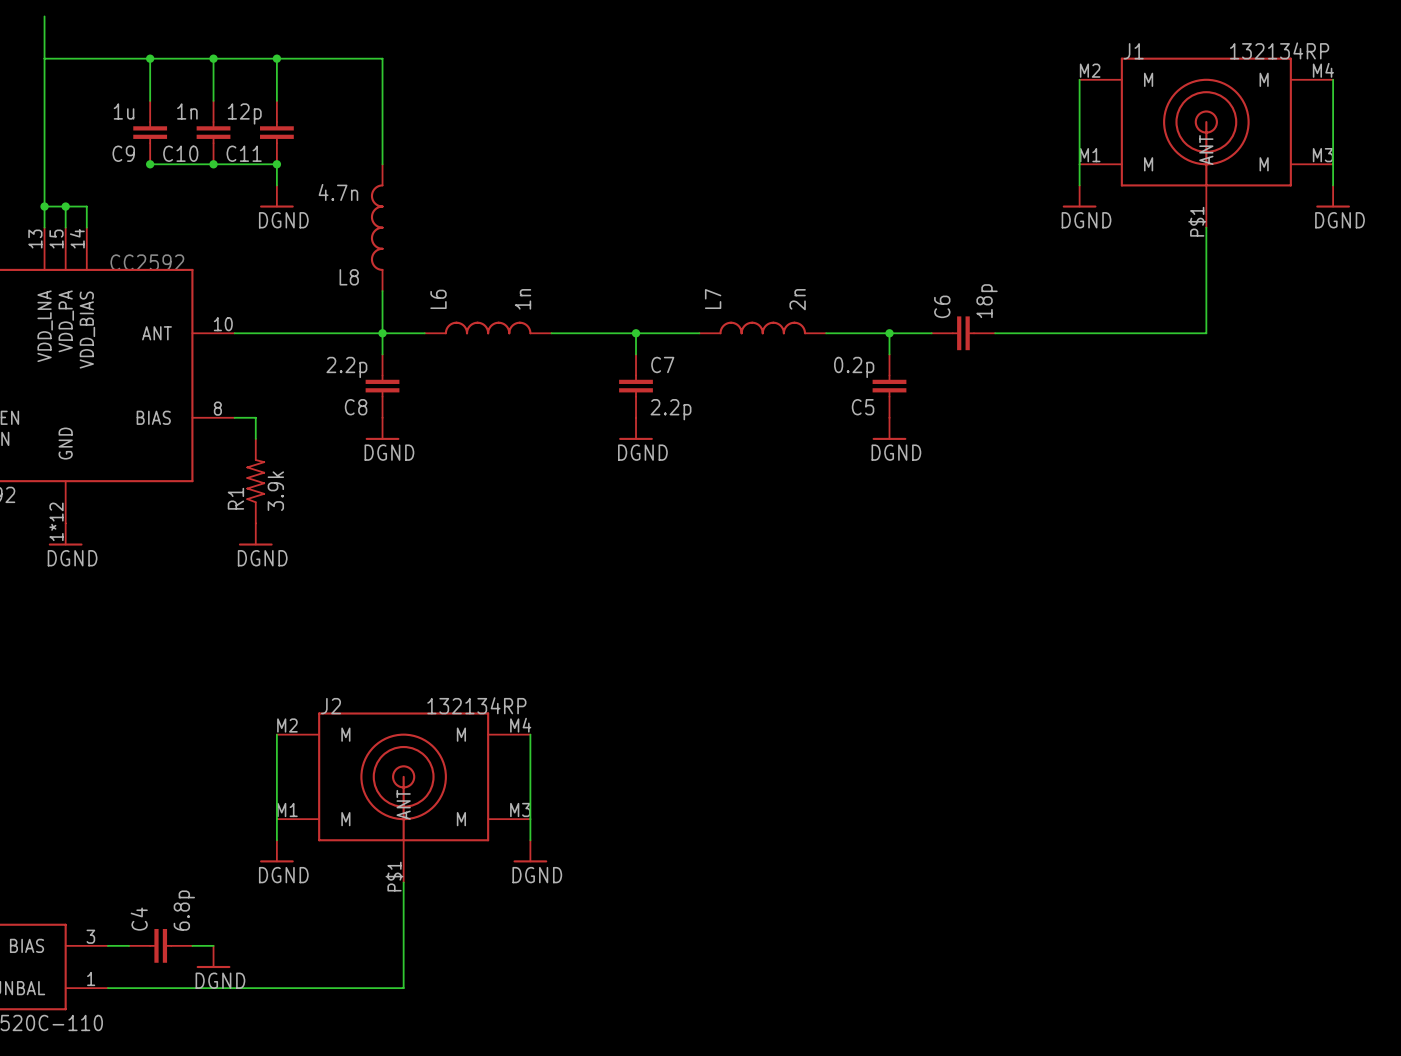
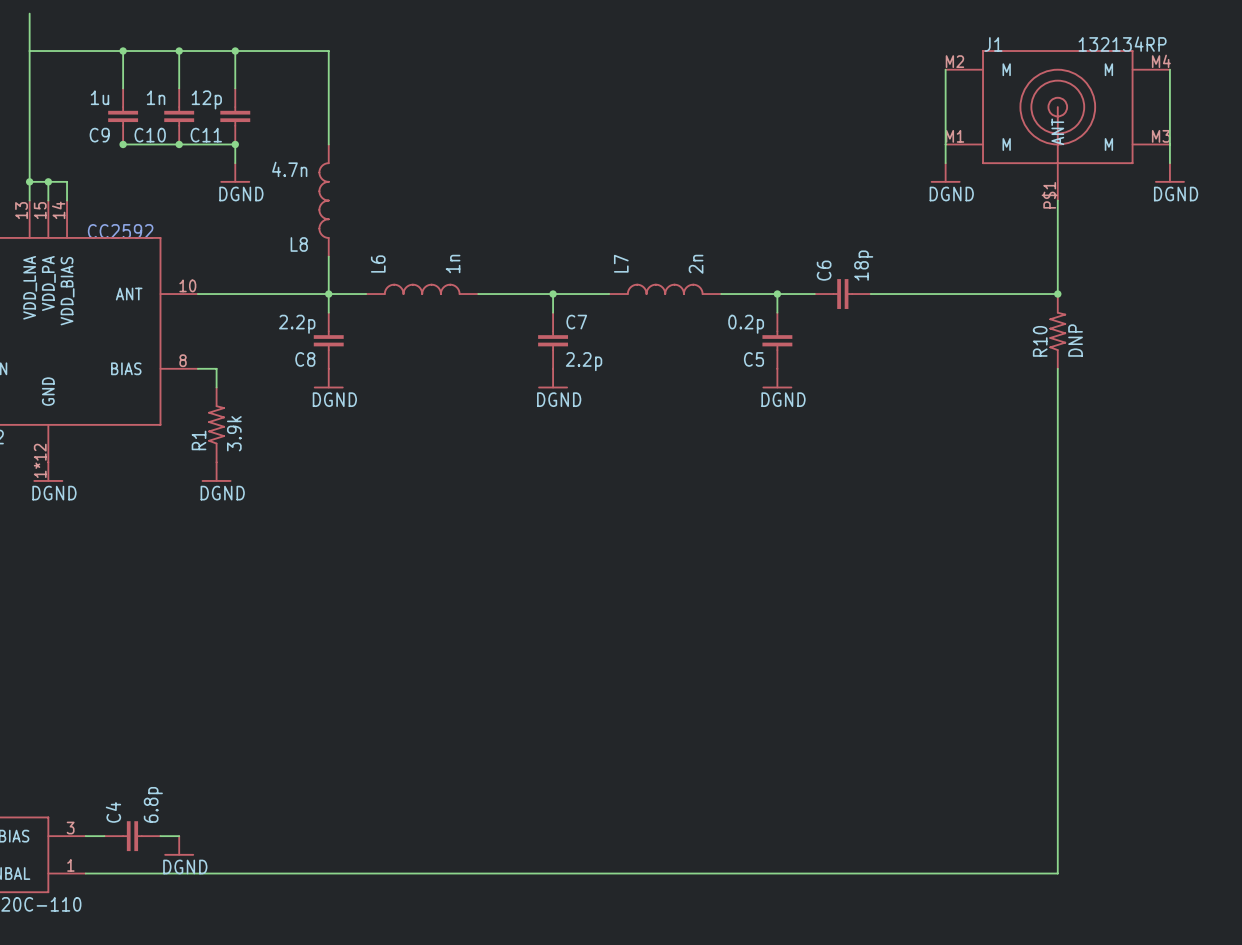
junction: none -> (1057, 294)
R10: none -> DNP (1057, 331)
wire: (276, 734) (276, 840) -> none
wire: (530, 734) (530, 840) -> none
J2: 132134RP (403, 797) -> none
power symbol: DGND (276, 851) -> none
power symbol: DGND (530, 851) -> none
wire: (403, 882) (403, 988) -> (1057, 368) (1057, 873) (347, 873)

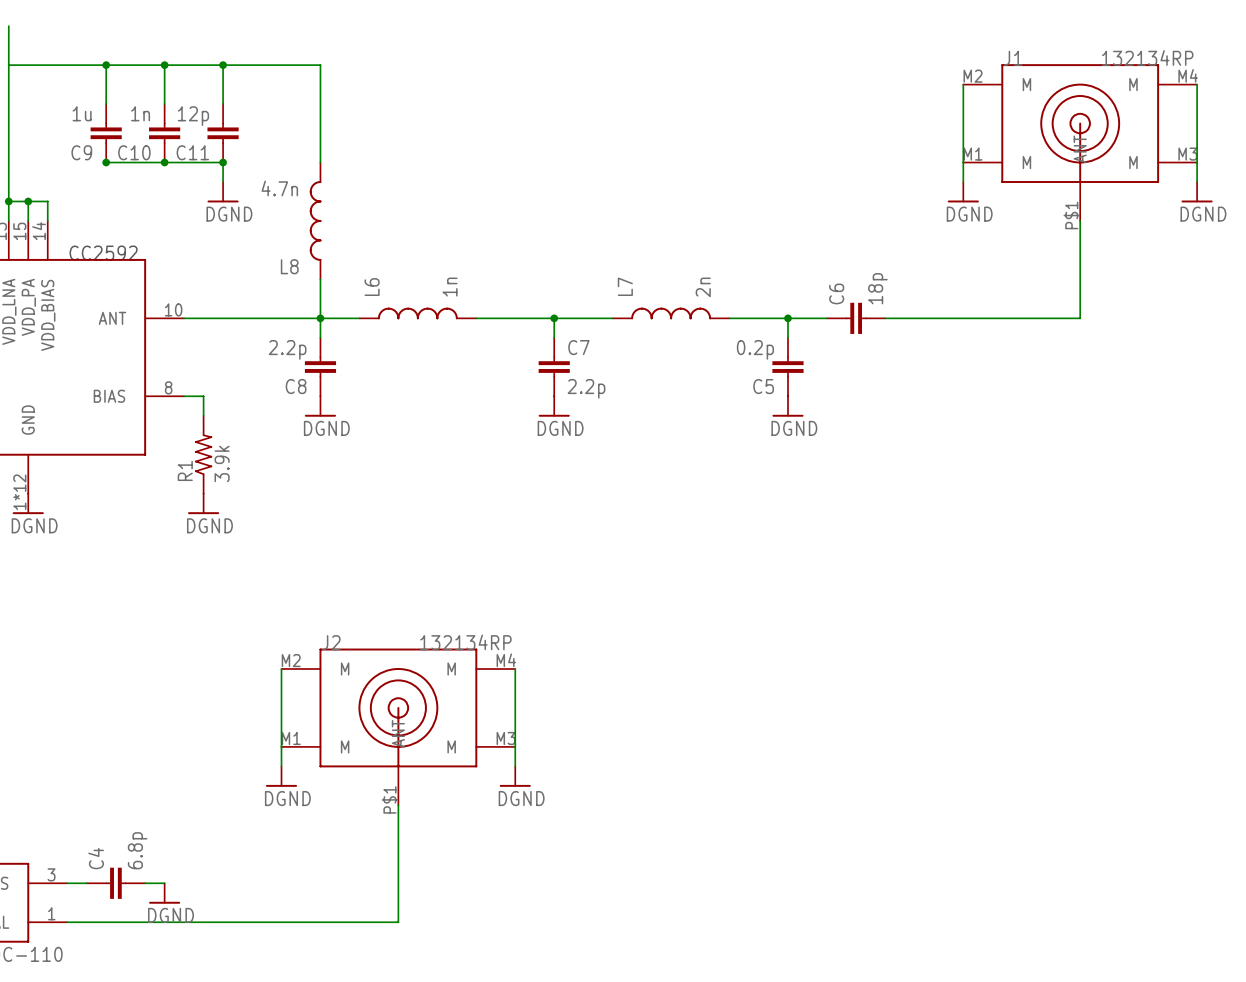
junction: (1057, 294) -> none
R10: DNP (1057, 331) -> none
wire: (1057, 368) (1057, 873) (403, 873) -> (398, 805) (398, 922)
wire: none -> (281, 669) (281, 766)
wire: none -> (515, 669) (515, 766)
J2: none -> 132134RP (398, 726)
power symbol: none -> DGND (281, 776)
power symbol: none -> DGND (515, 776)

